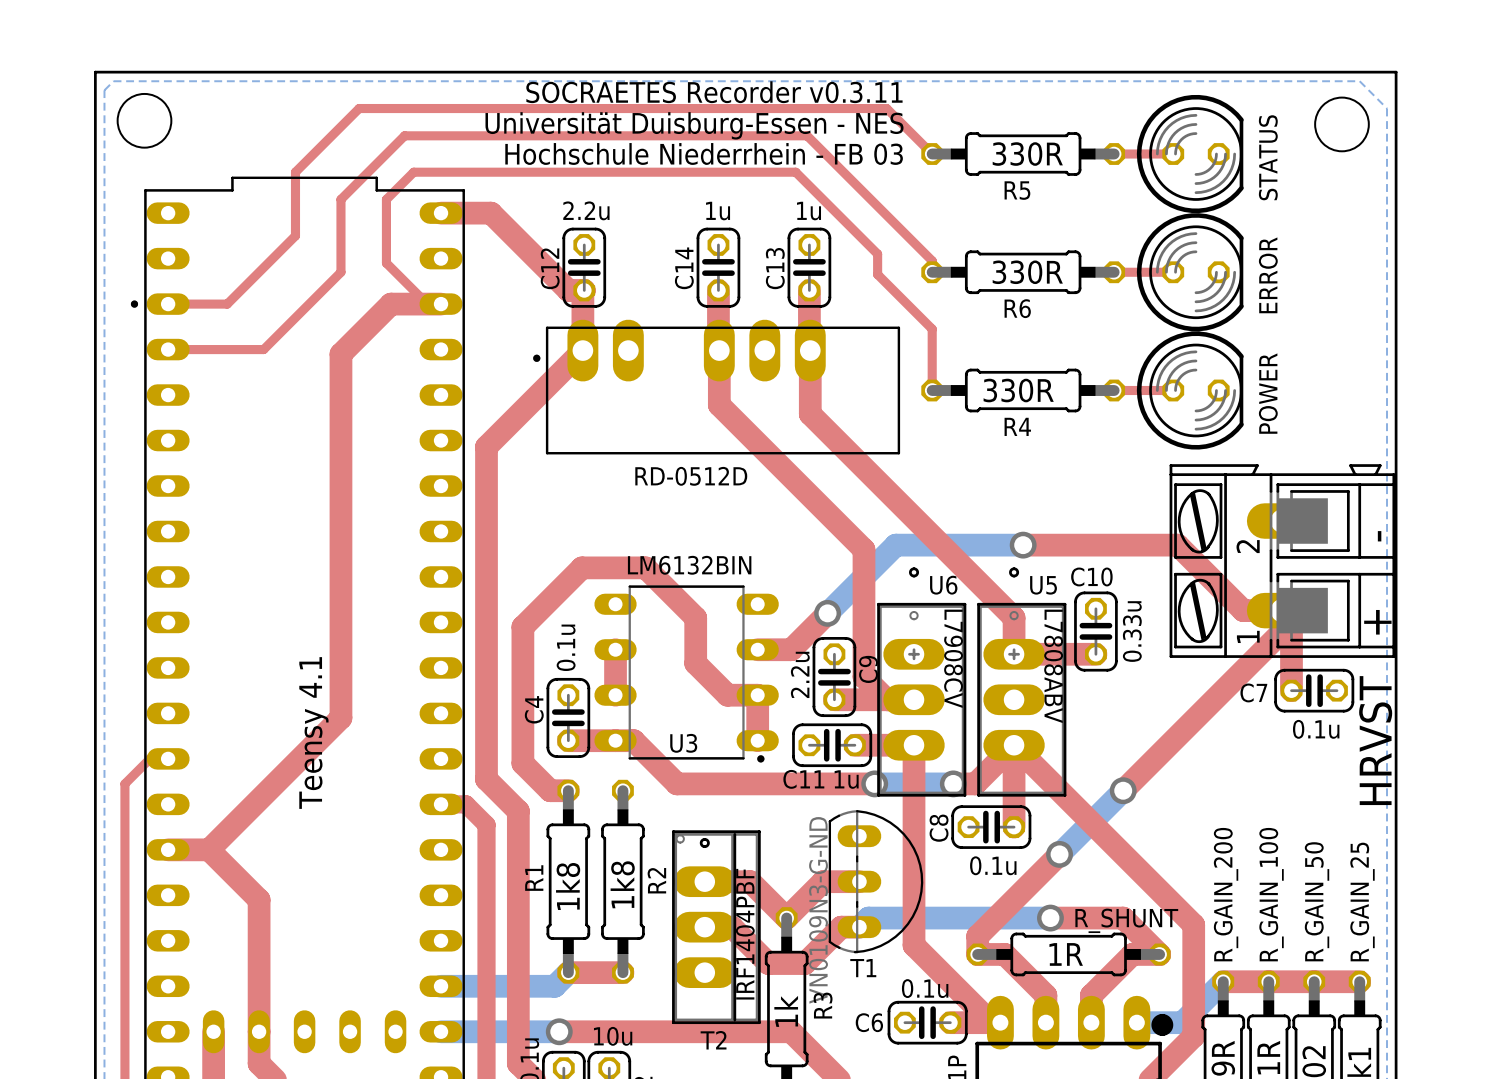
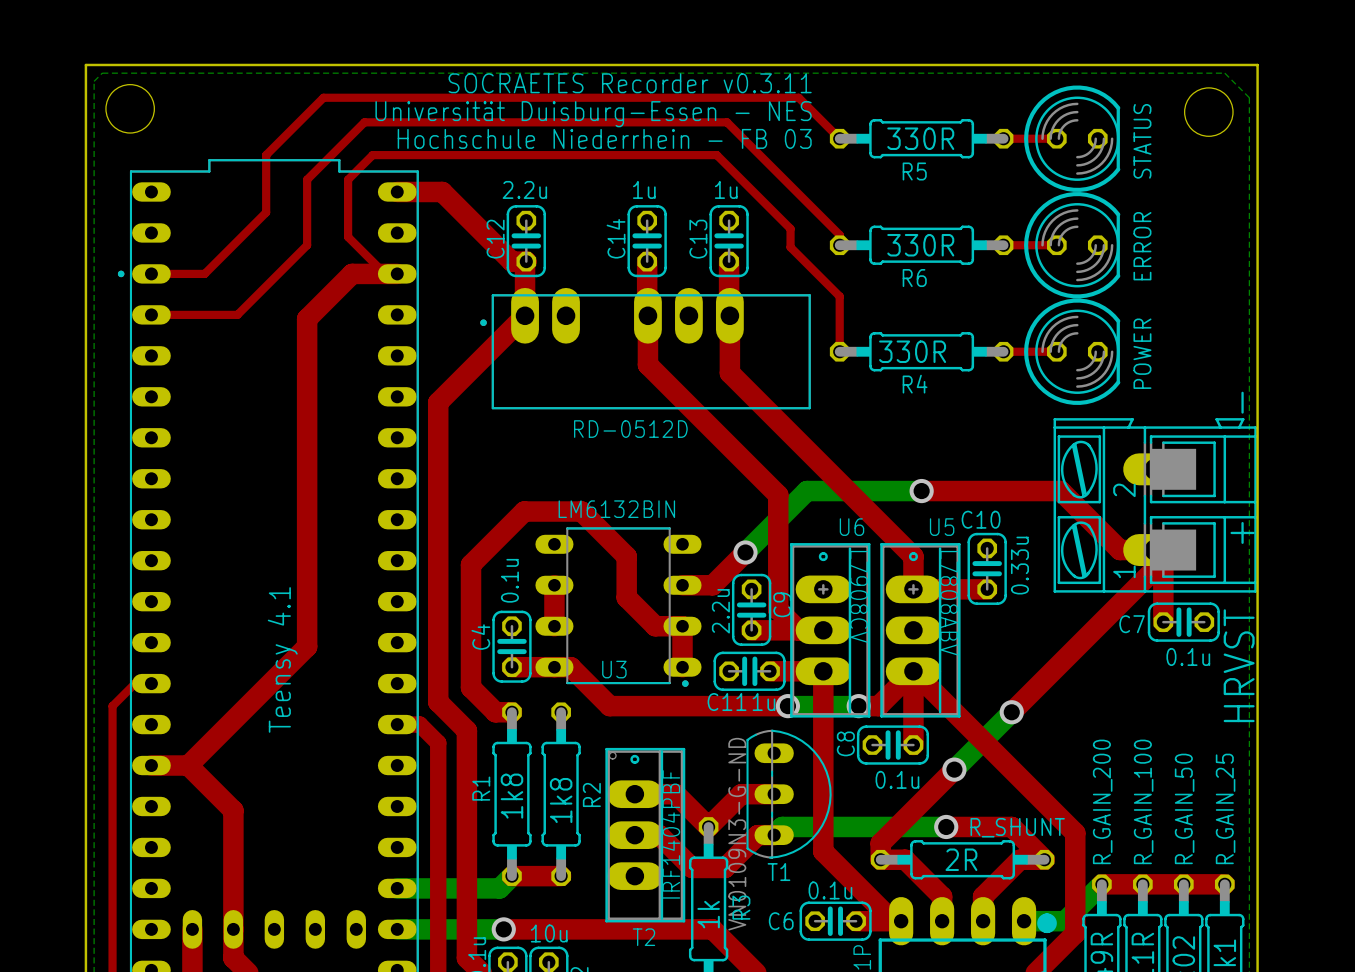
U6 footprint: [877, 567, 967, 797] -> [790, 543, 871, 718]
U5 footprint: [977, 567, 1067, 797] -> [880, 543, 961, 718]
R_SHUNT value: 1R (1066, 954) -> 2R (961, 859)

